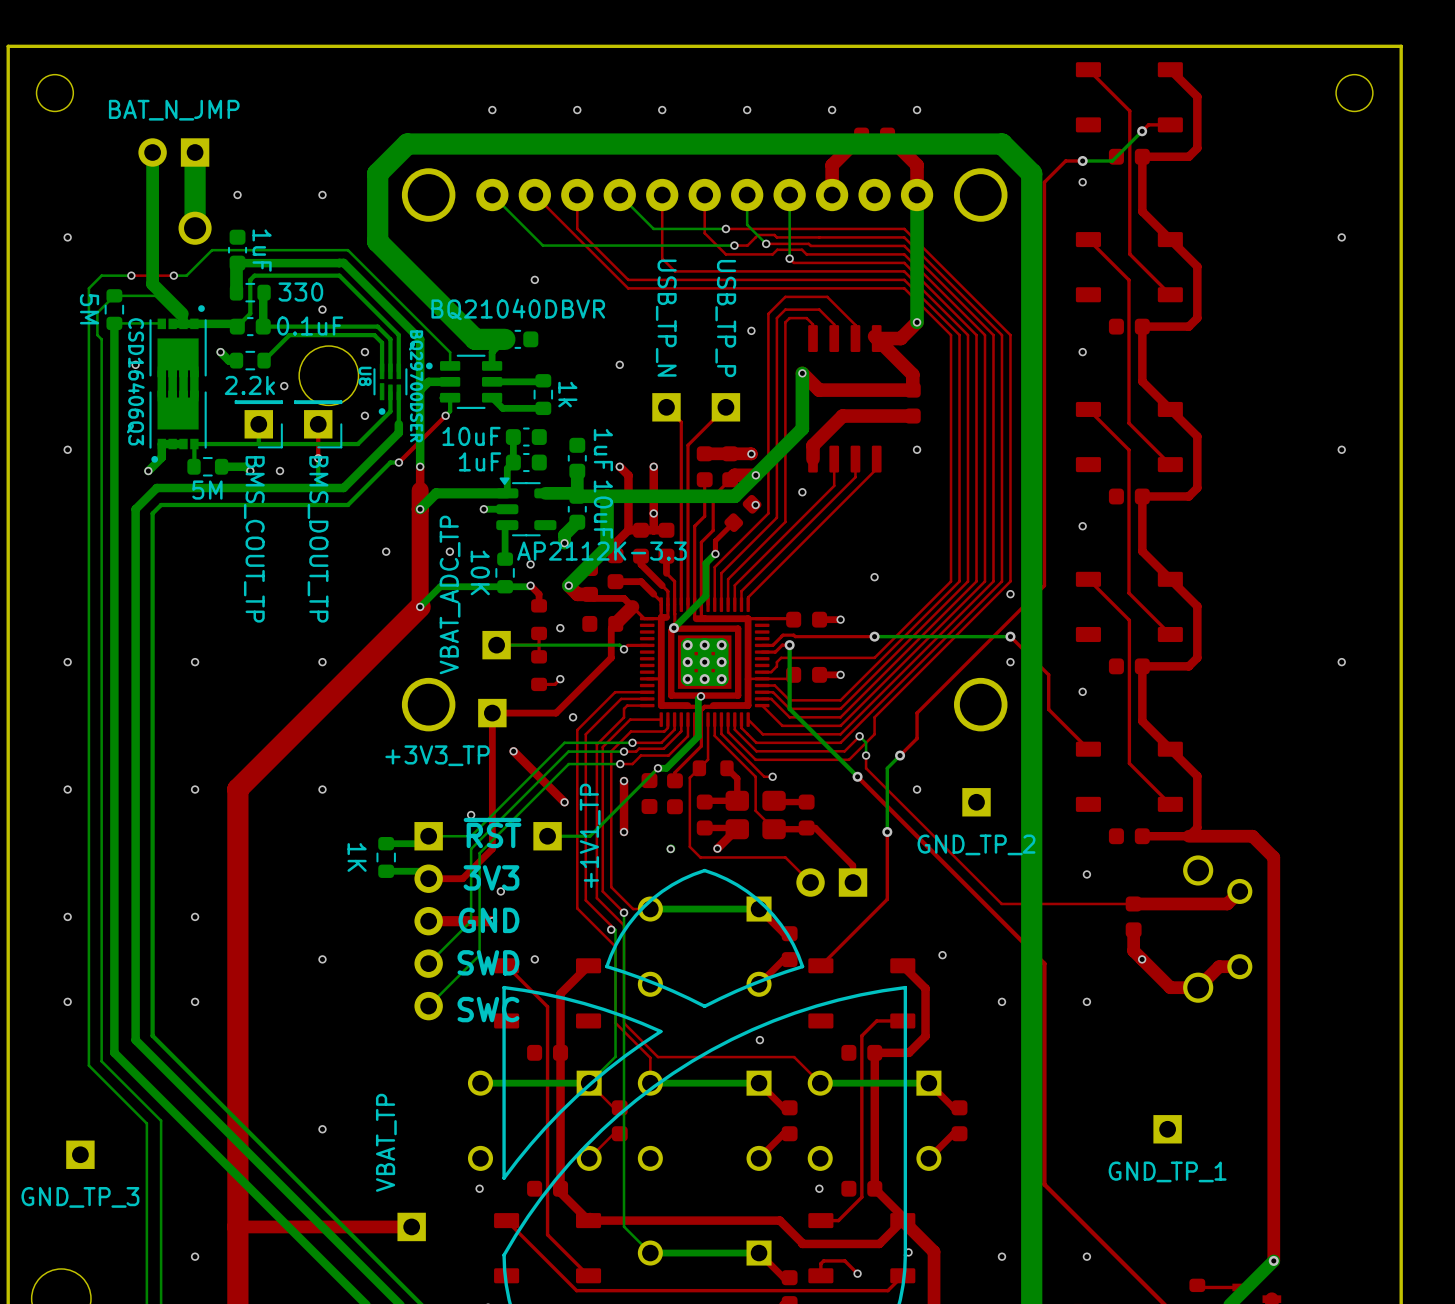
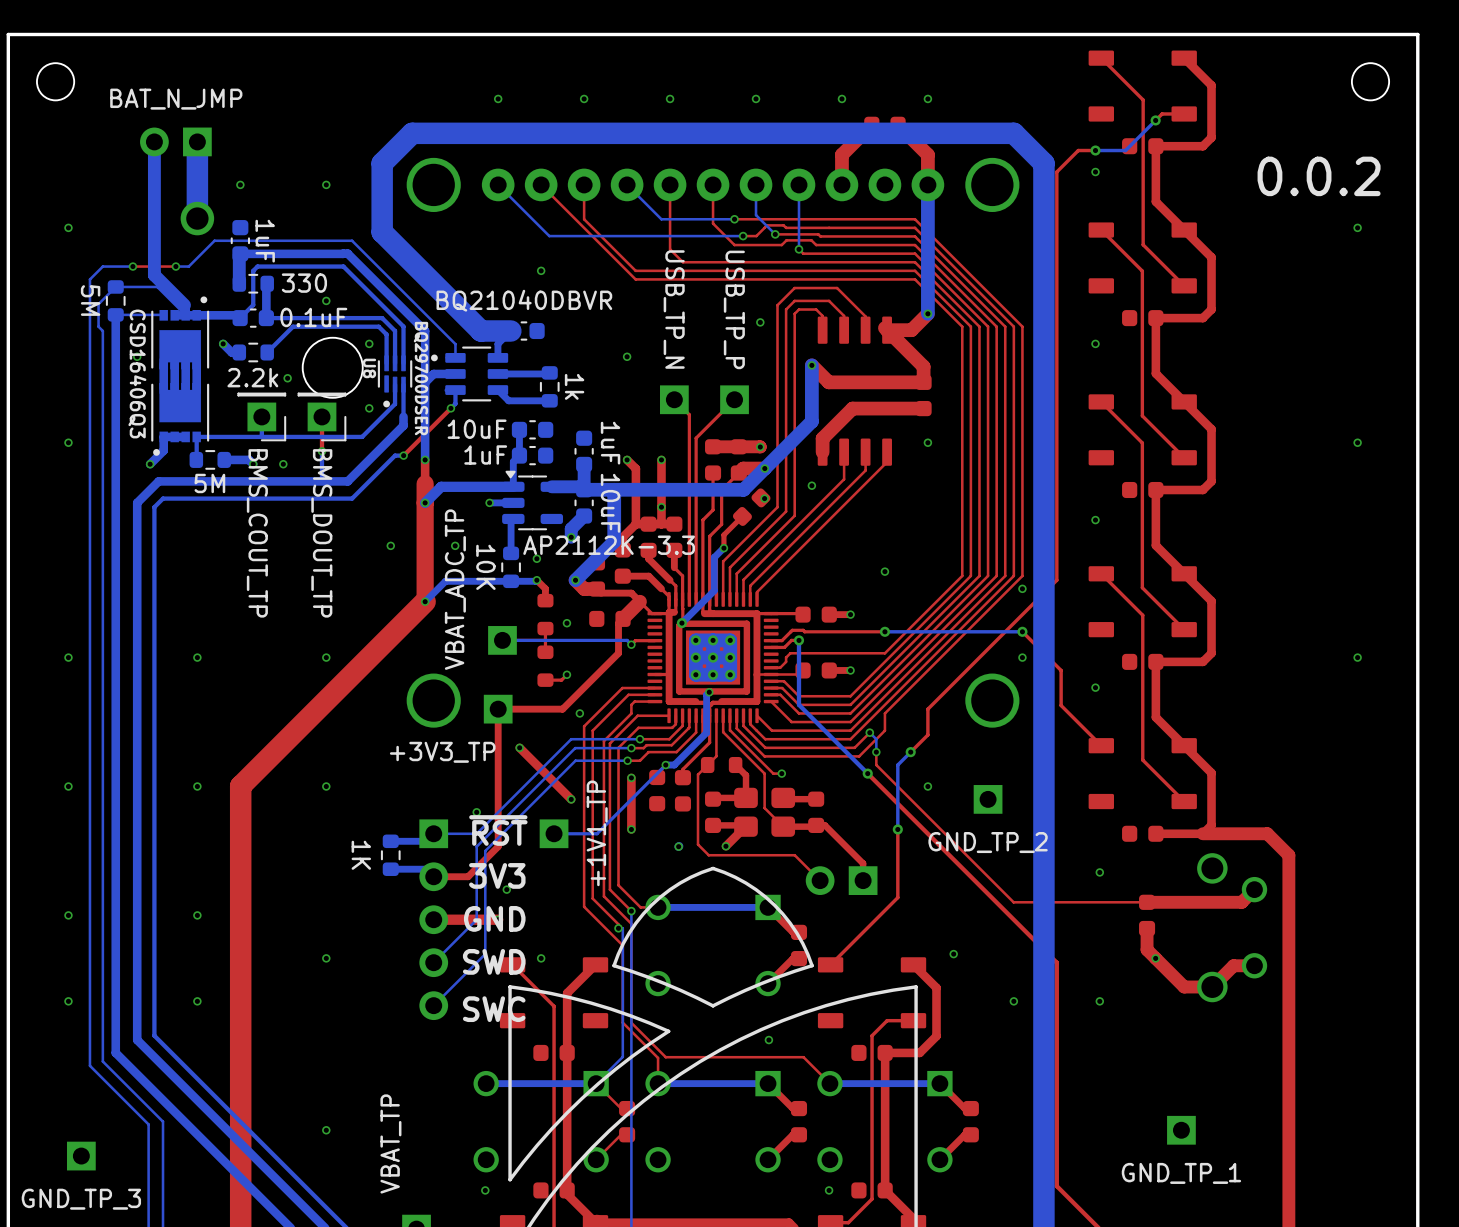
text: none -> 0.0.2 (1319, 176)

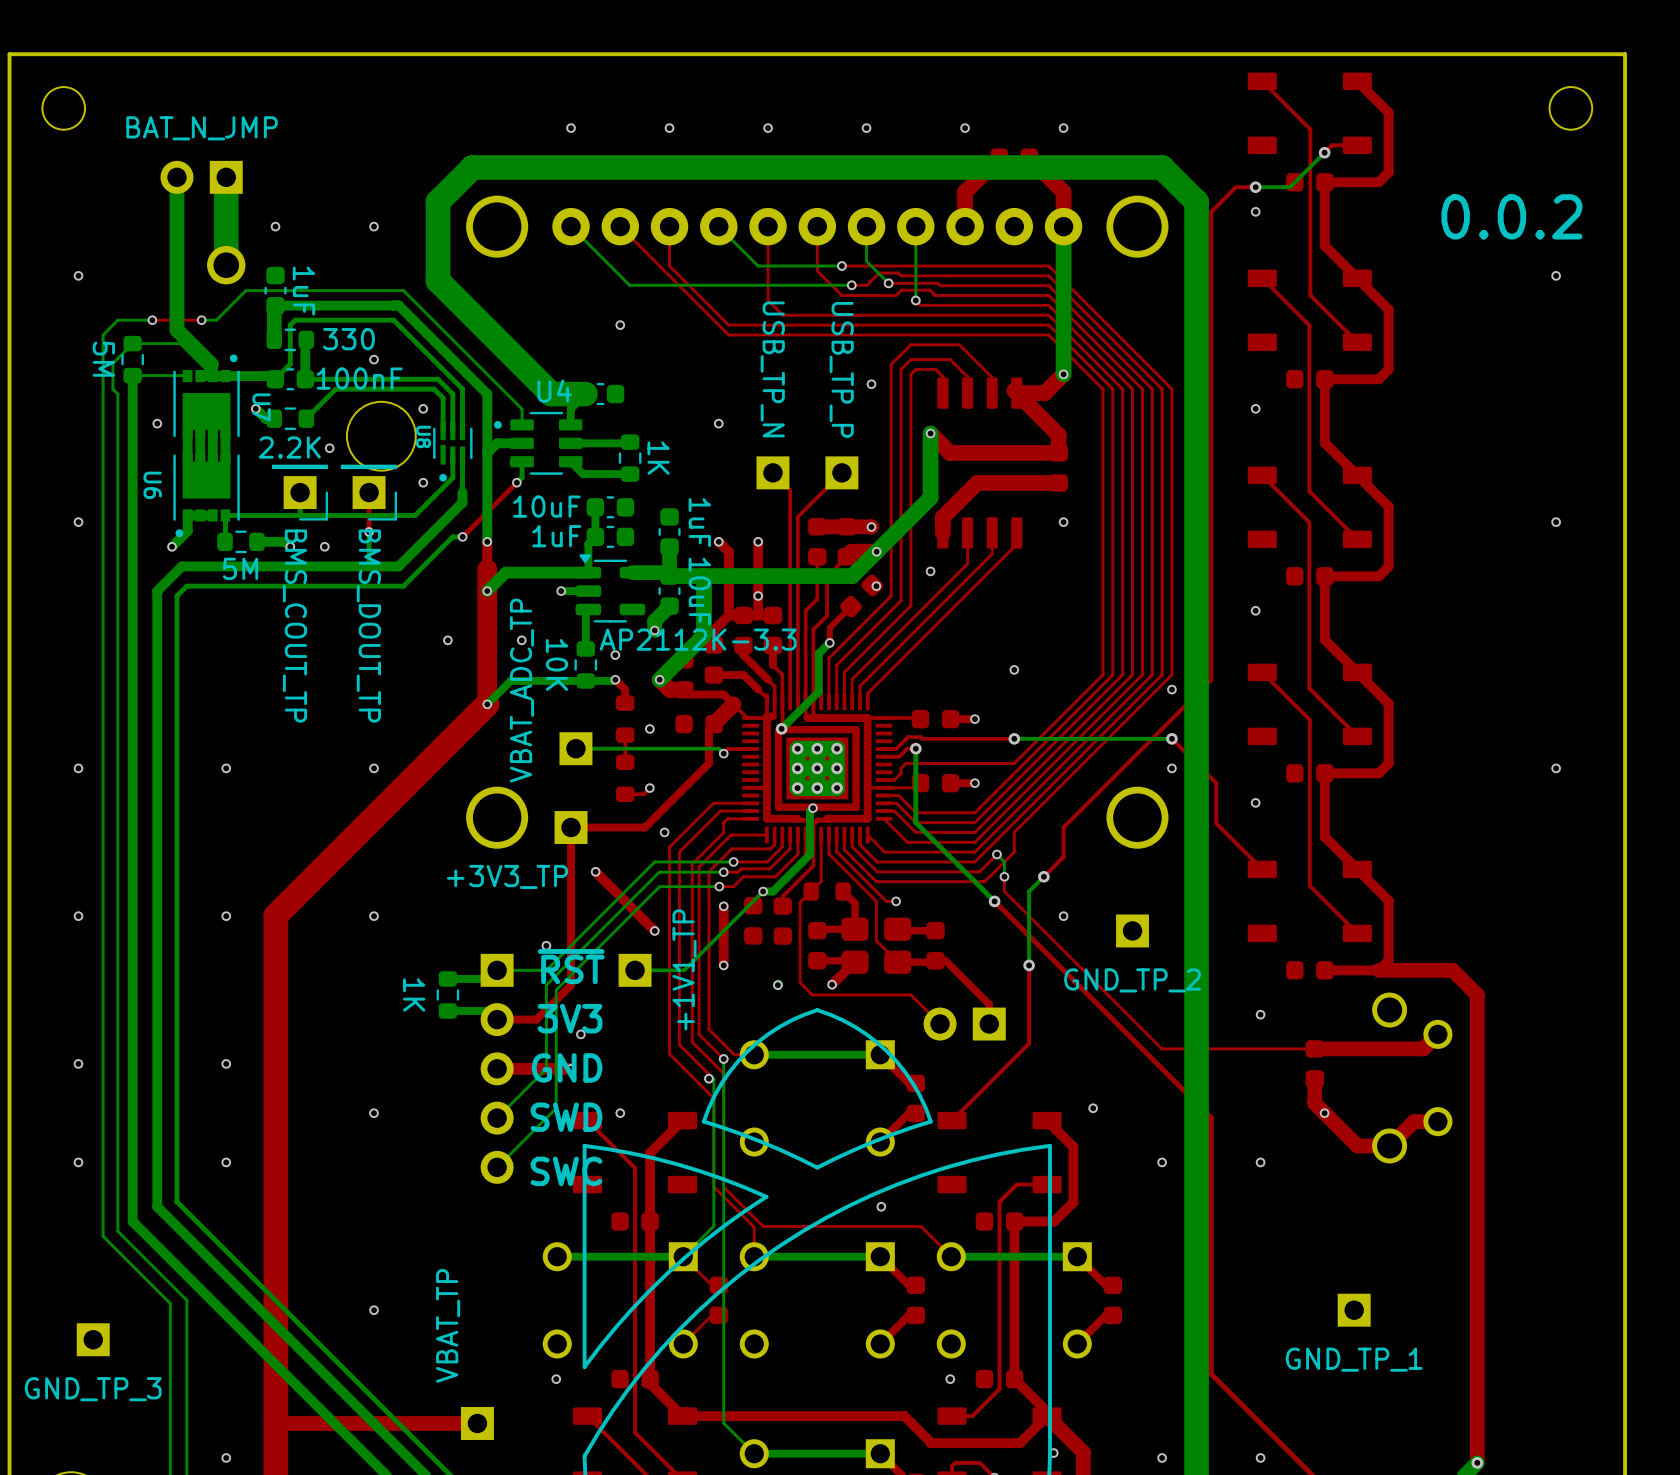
U4 value: BQ21040DBVR (524, 300) -> none
part value: 0.1uF (313, 317) -> 100nF (359, 378)
U4 name: none -> U4 (554, 391)
U7 name: none -> U7 (261, 407)
U7 value: CSD16406Q3 (137, 373) -> none
part value: 2.2k (252, 377) -> 2.2K (289, 447)
U8 value: BQ29700DSER (420, 378) -> none
part value: 1k (574, 386) -> 1K (658, 458)
U6 name: none -> U6 (152, 485)

